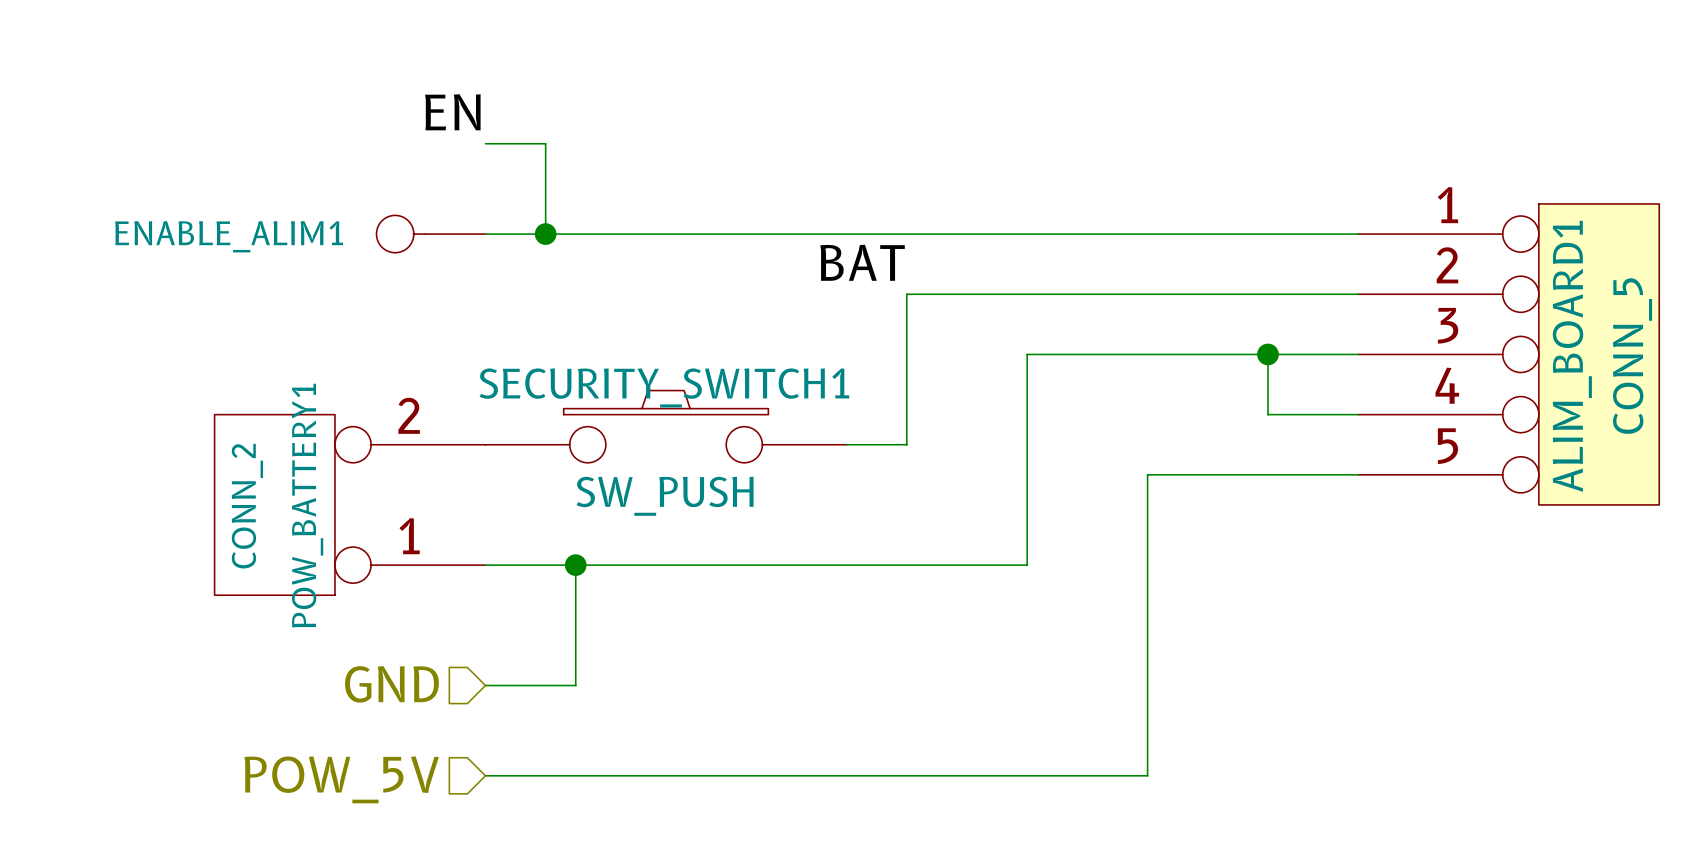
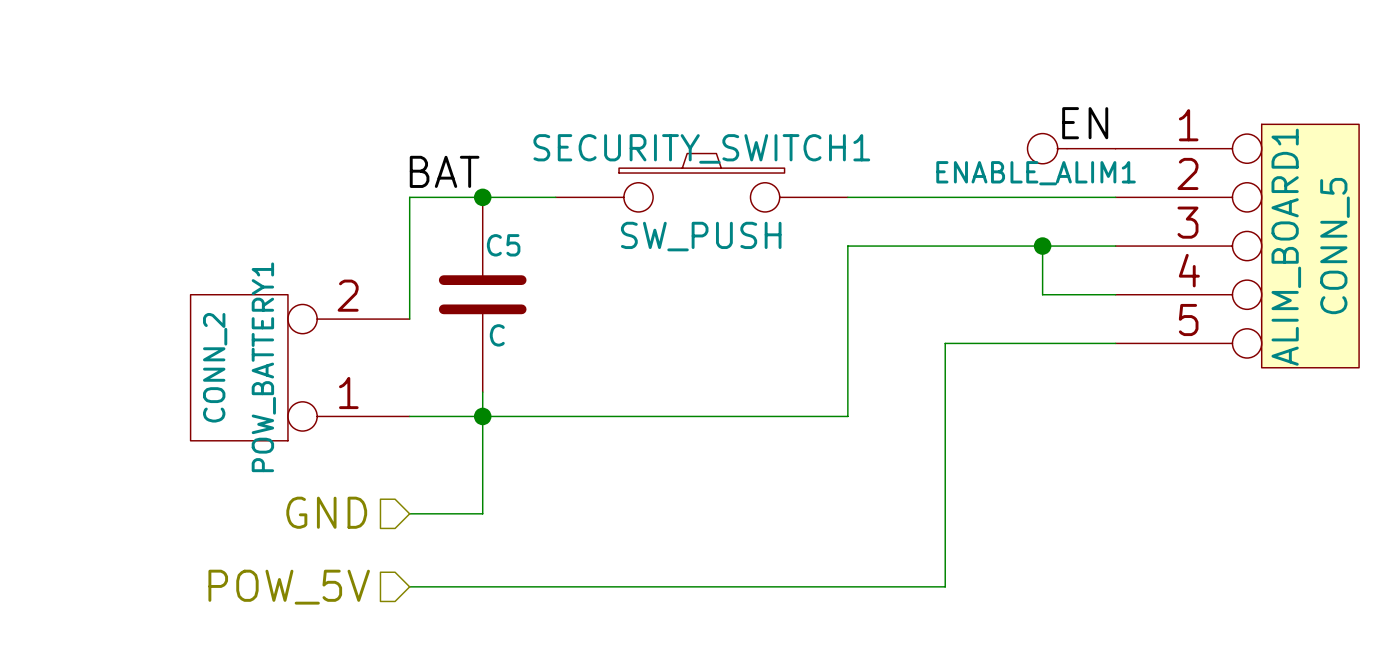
label: EN (452, 112) -> none
wire: (485, 143) (545, 143) (545, 234) -> none
label: none -> EN (1085, 123)
ENABLE_ALIM1 position: (430, 234) -> (1071, 148)
wire: (485, 234) (1358, 234) -> none
junction position: (545, 234) -> (482, 197)
ENABLE_ALIM1 name position: ENABLE_ALIM1 (229, 236) -> ENABLE_ALIM1 (1036, 173)
label position: BAT (862, 262) -> BAT (444, 171)
wire: none -> (555, 197) (409, 197) (409, 319)
wire: (1027, 294) (906, 294) (906, 444) (846, 444) -> none
C5: none -> C (482, 294)
SECURITY_SWITCH1 position: (666, 426) -> (701, 182)
wire: none -> (482, 392) (482, 416)

